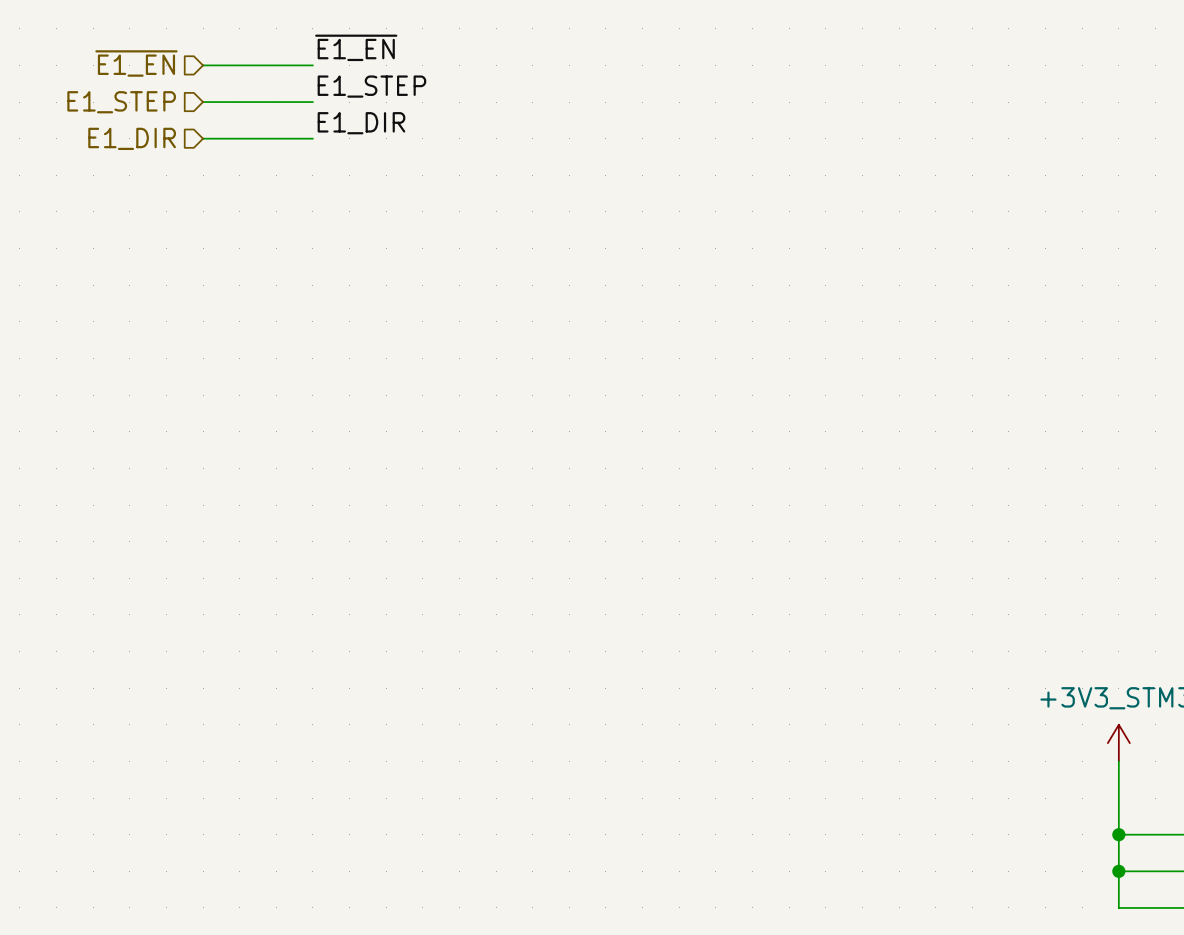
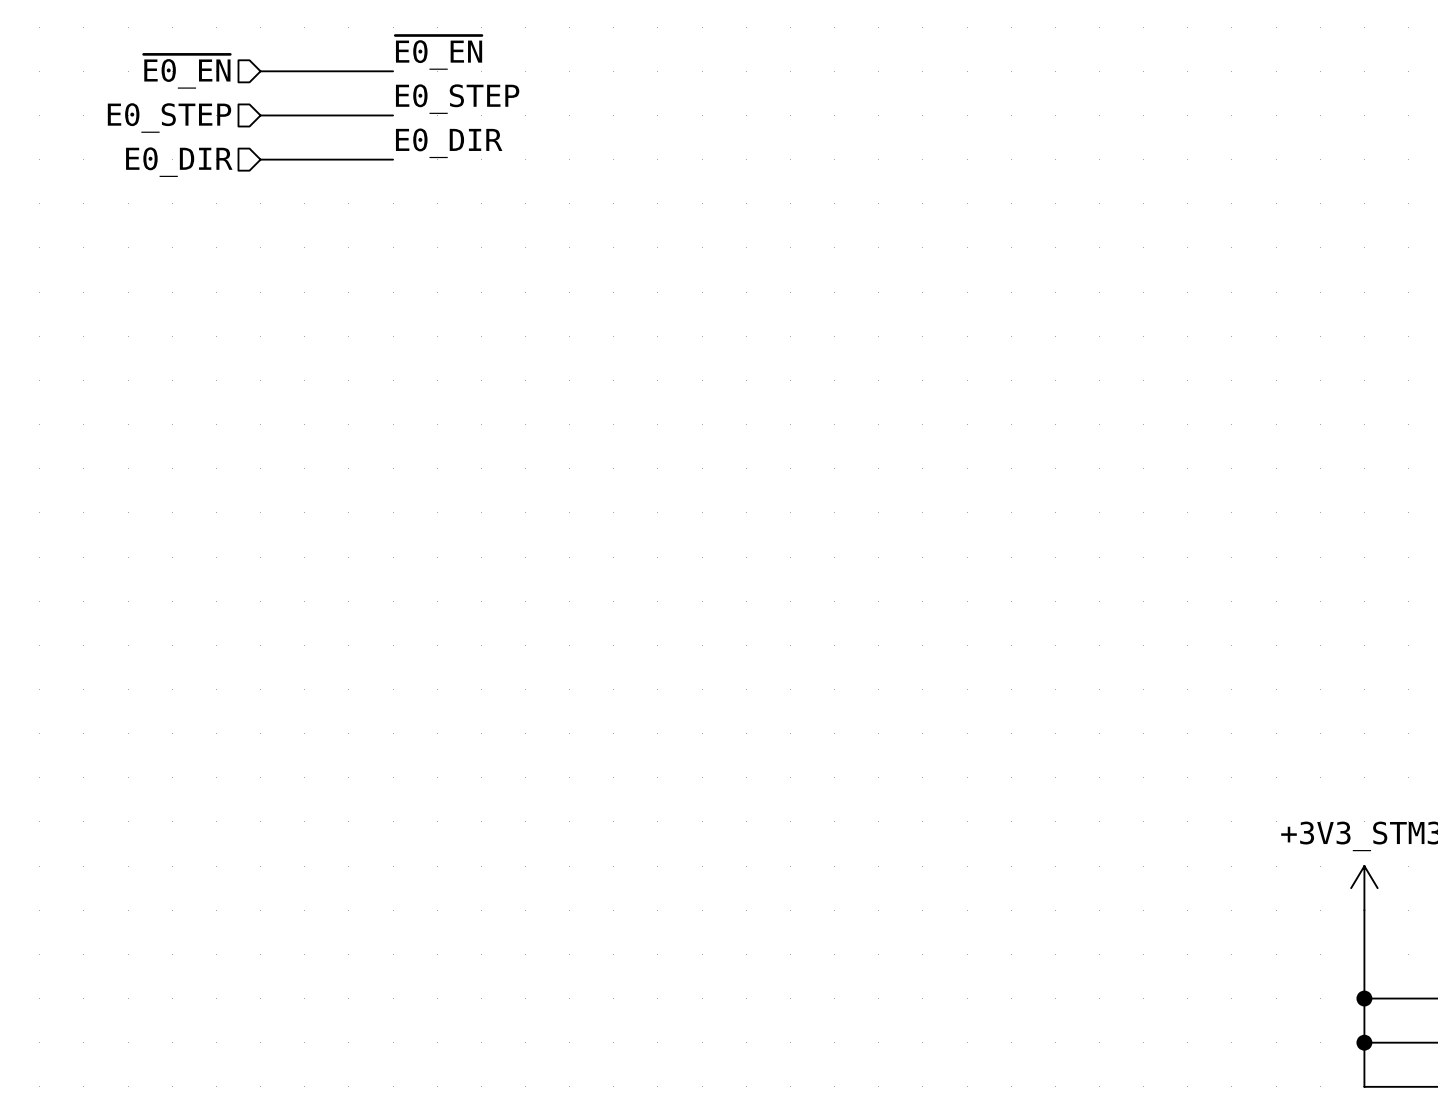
label: ~{E1_EN} (356, 47) -> ~{E0_EN} (438, 52)
hierarchical label: ~{E1_EN} (136, 63) -> ~{E0_EN} (187, 71)
label: E1_STEP (371, 86) -> E0_STEP (457, 99)
hierarchical label: E1_STEP (121, 102) -> E0_STEP (169, 118)
label: E1_DIR (361, 123) -> E0_DIR (449, 143)
hierarchical label: E1_DIR (132, 138) -> E0_DIR (179, 162)

